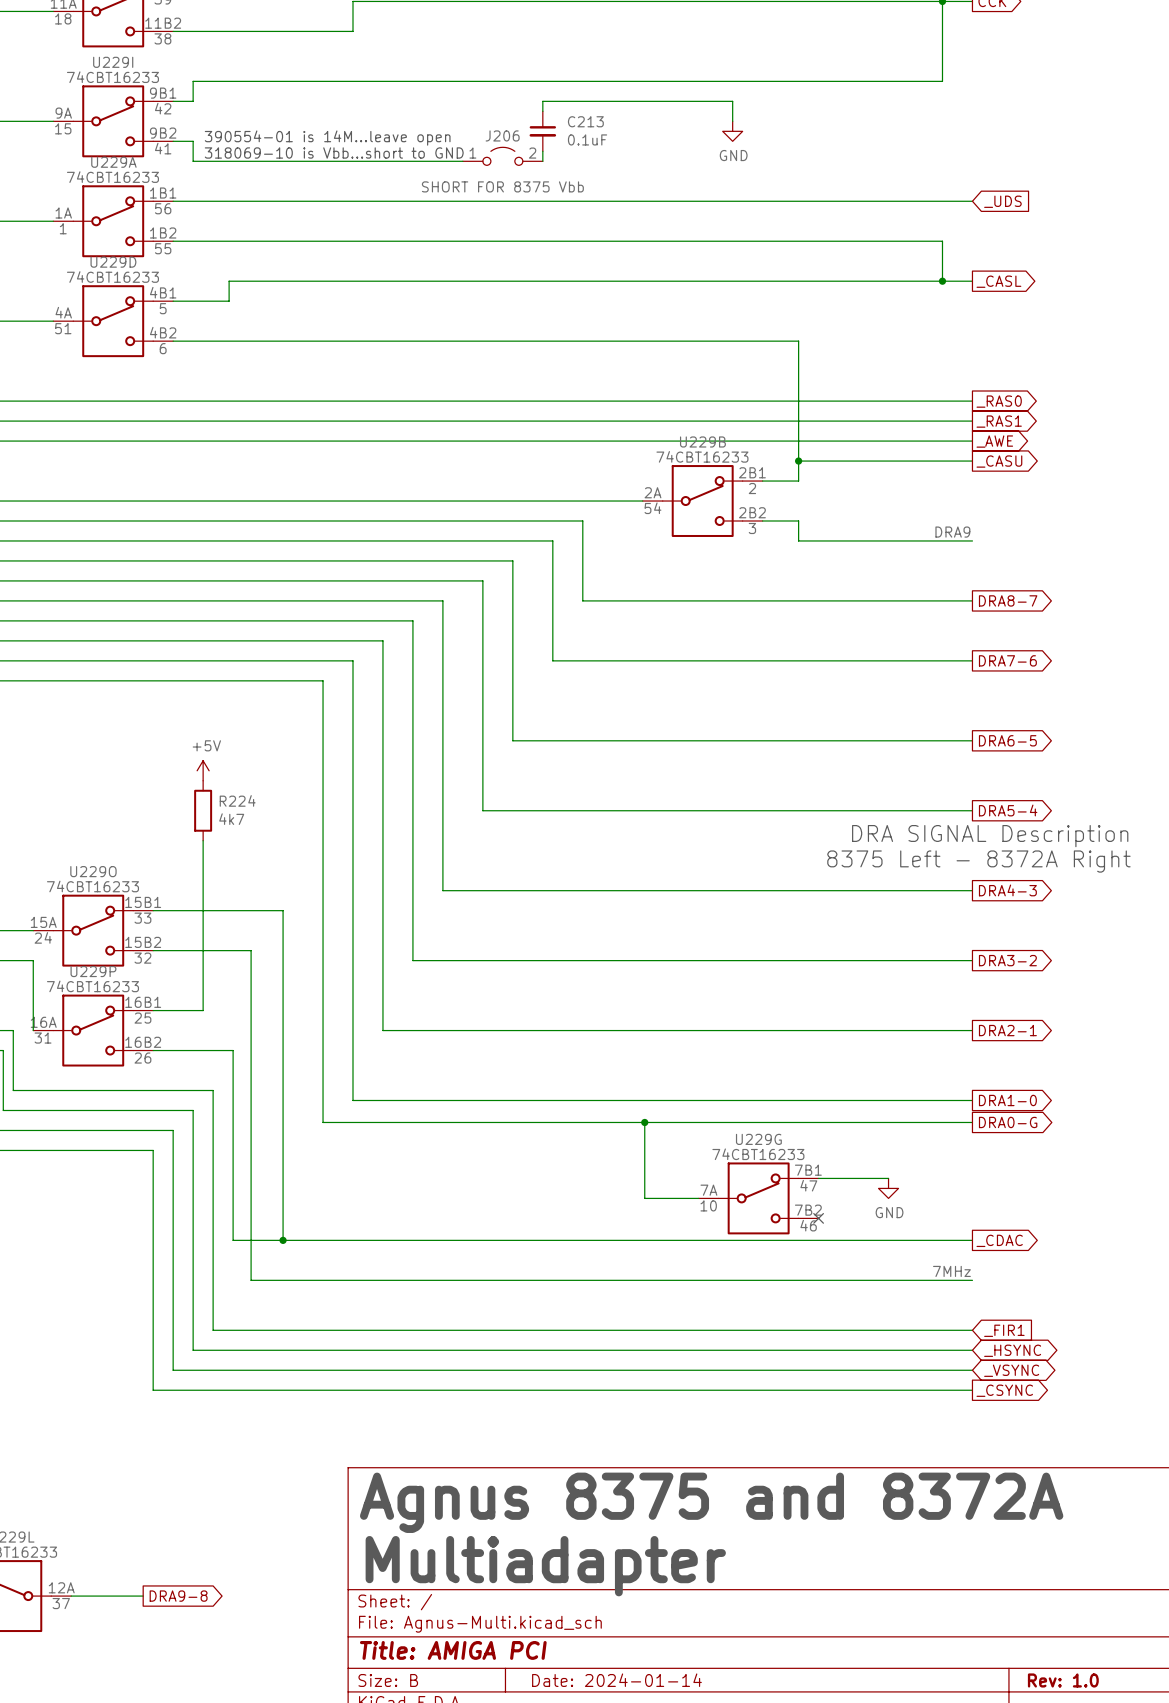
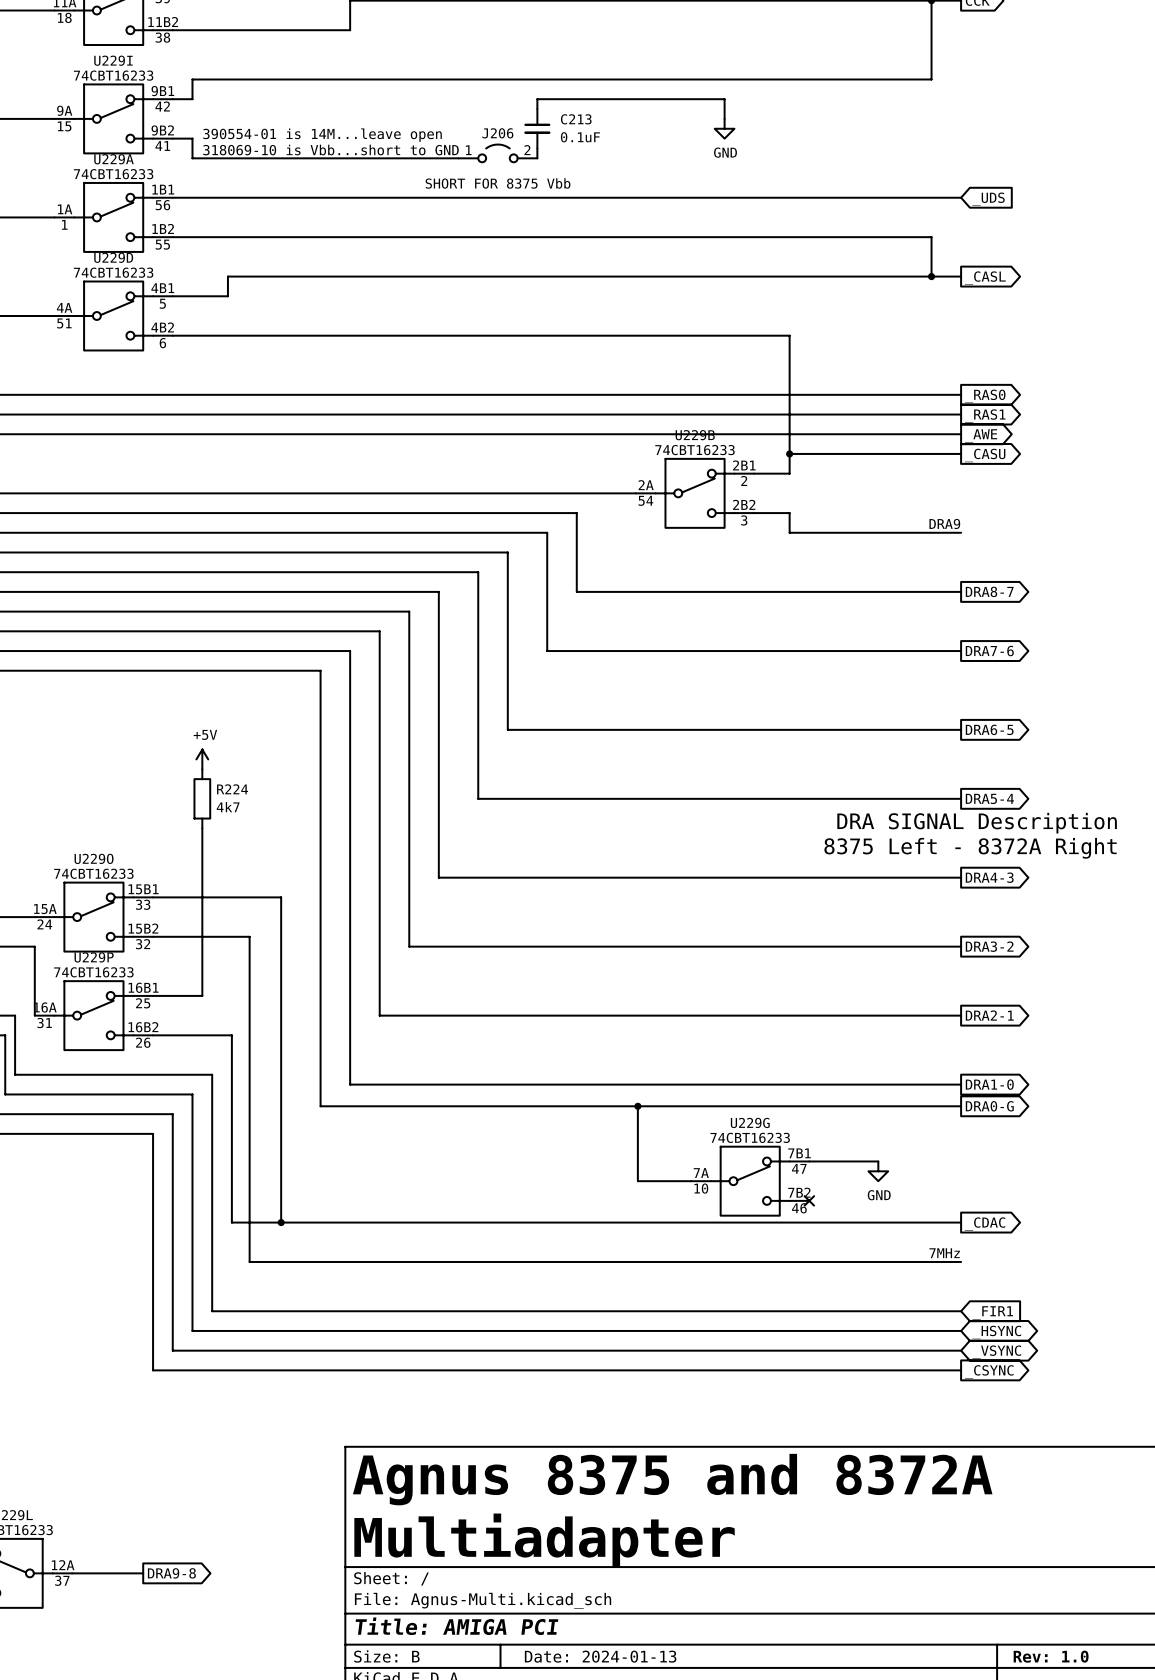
title block: Date: 2024-01-14 (616, 1680) -> Date: 2024-01-13 (600, 1656)

